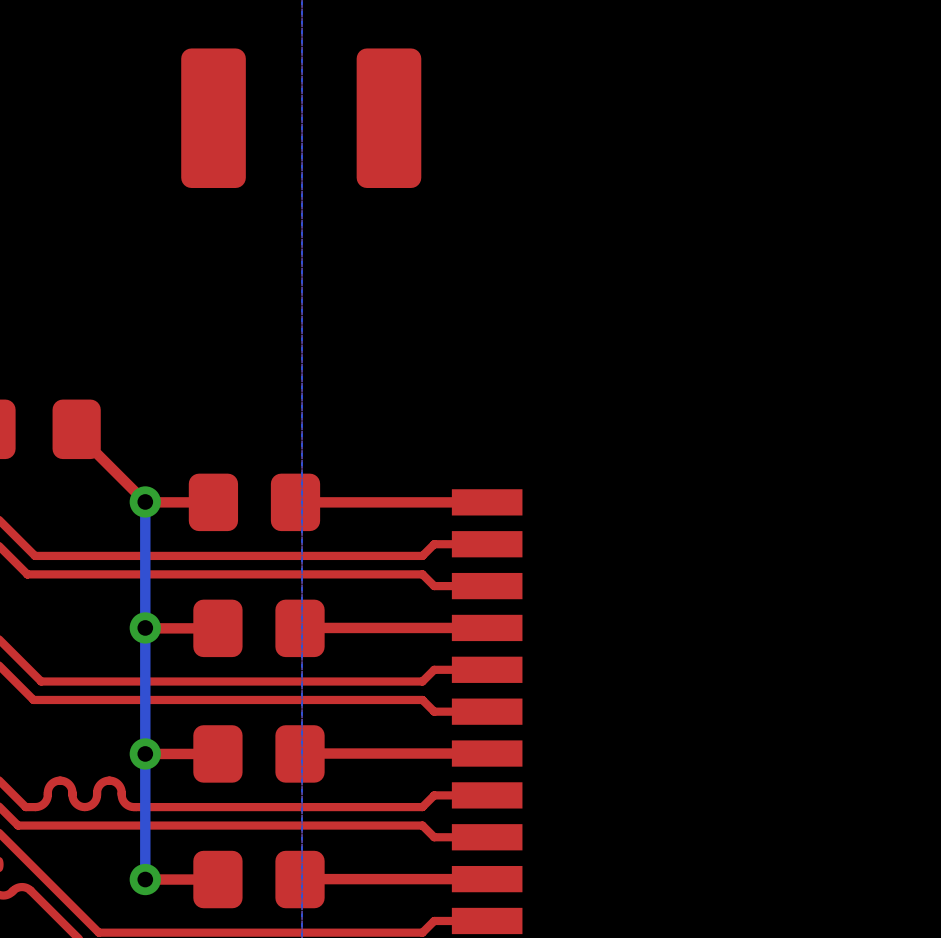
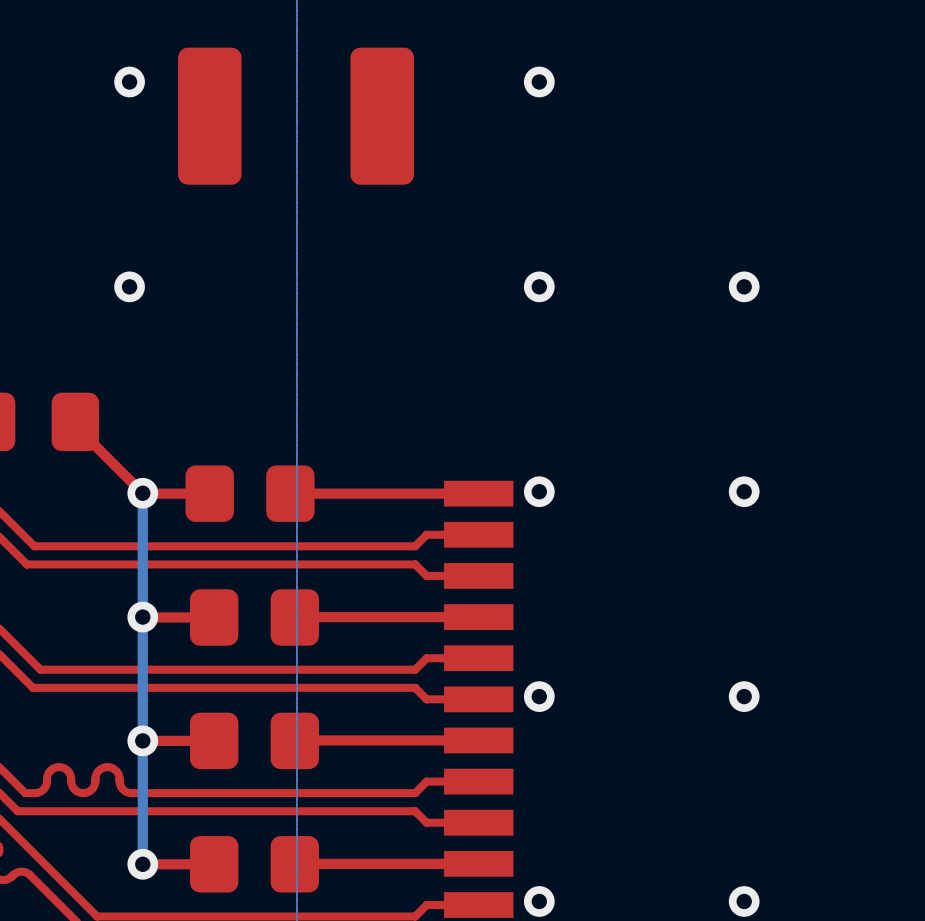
via: none -> (129, 81)
via: none -> (539, 81)
via: none -> (129, 286)
via: none -> (539, 286)
via: none -> (744, 286)
via: none -> (539, 491)
via: none -> (744, 491)
via: none -> (539, 696)
via: none -> (744, 696)
via: none -> (539, 901)
via: none -> (744, 901)

